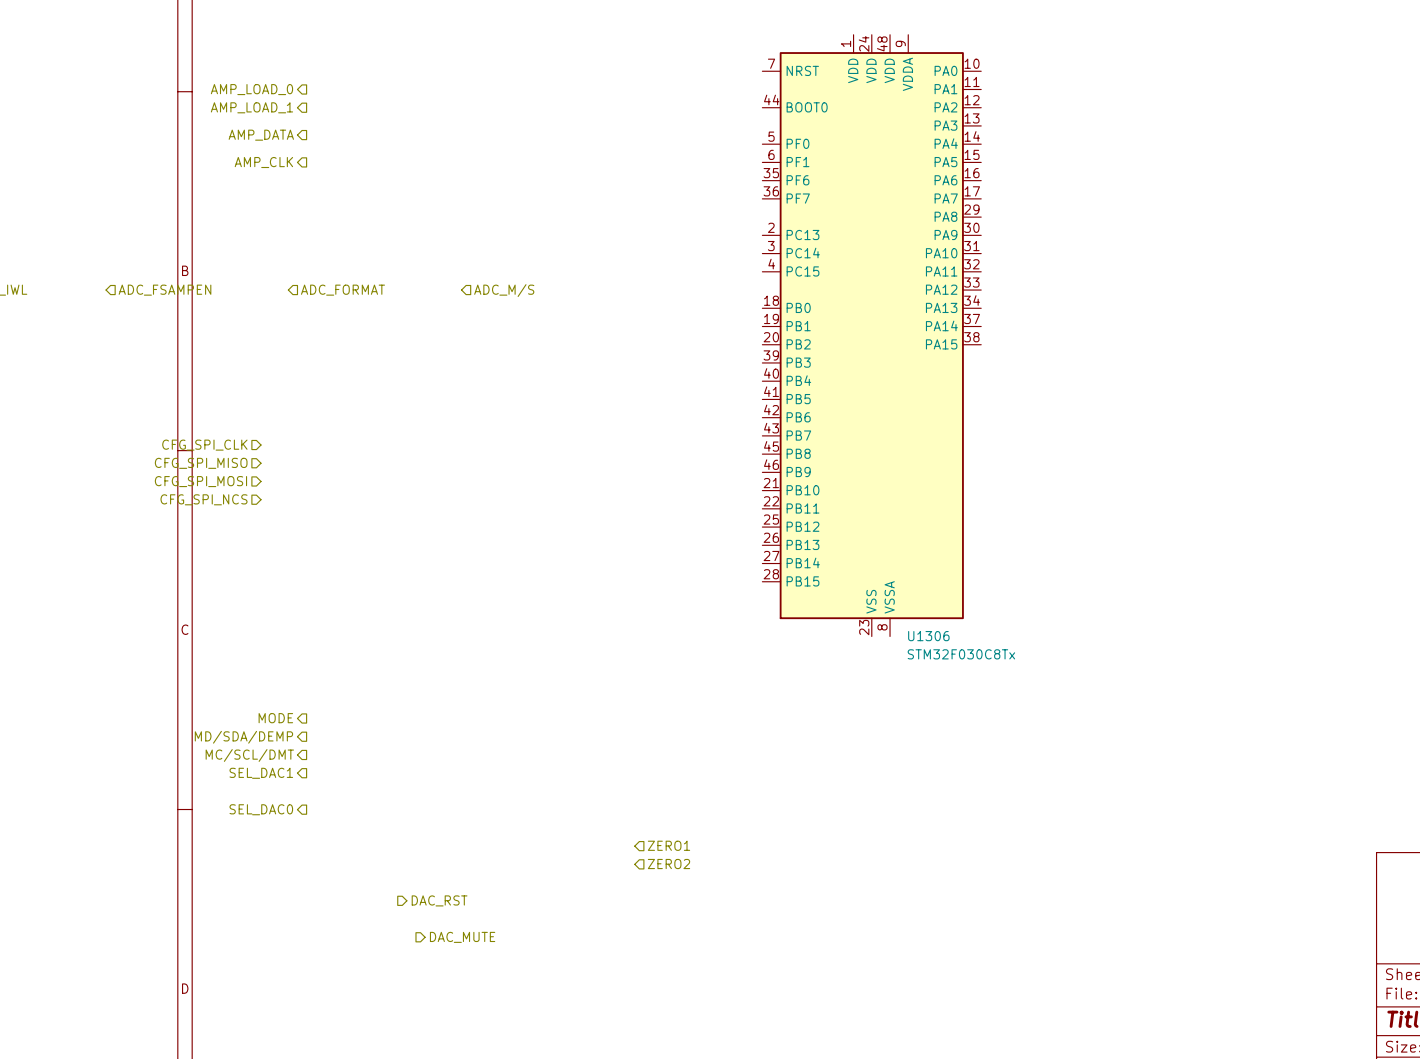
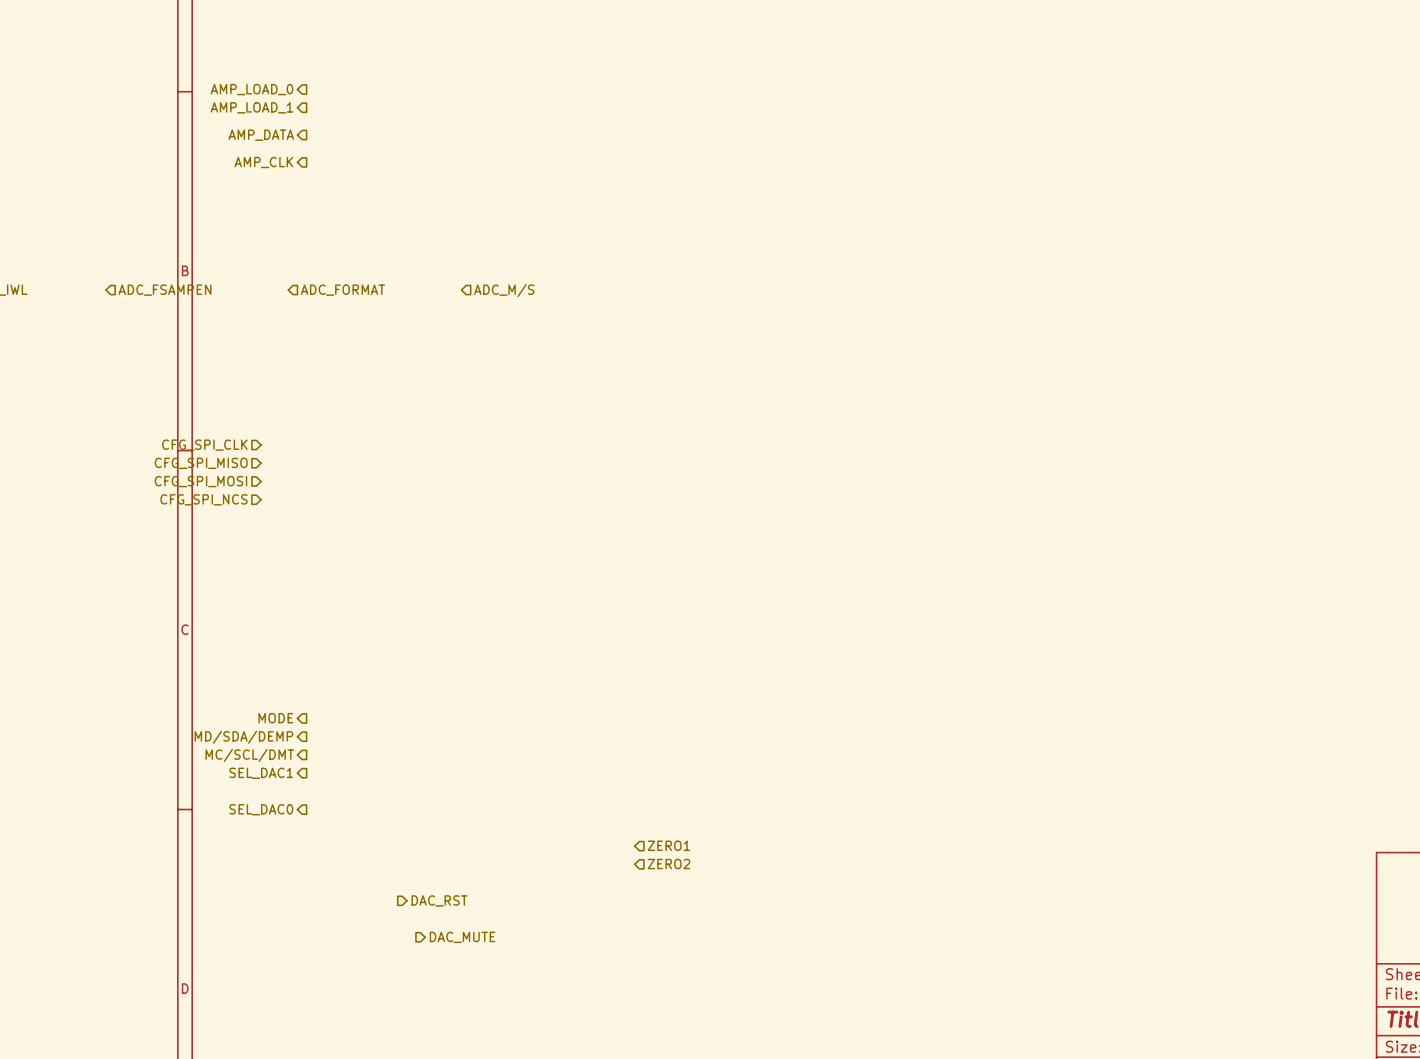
U1306: STM32F030C8Tx (871, 335) -> none

